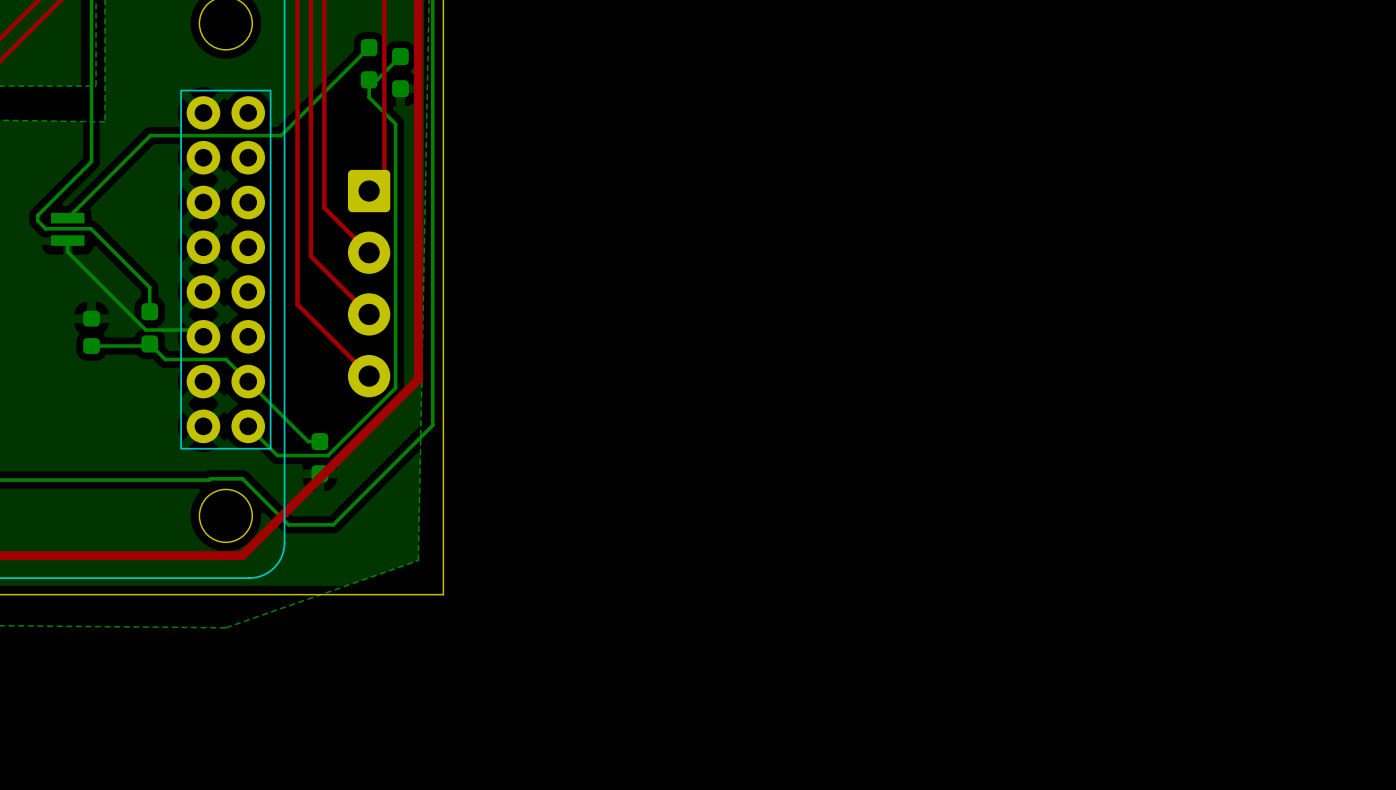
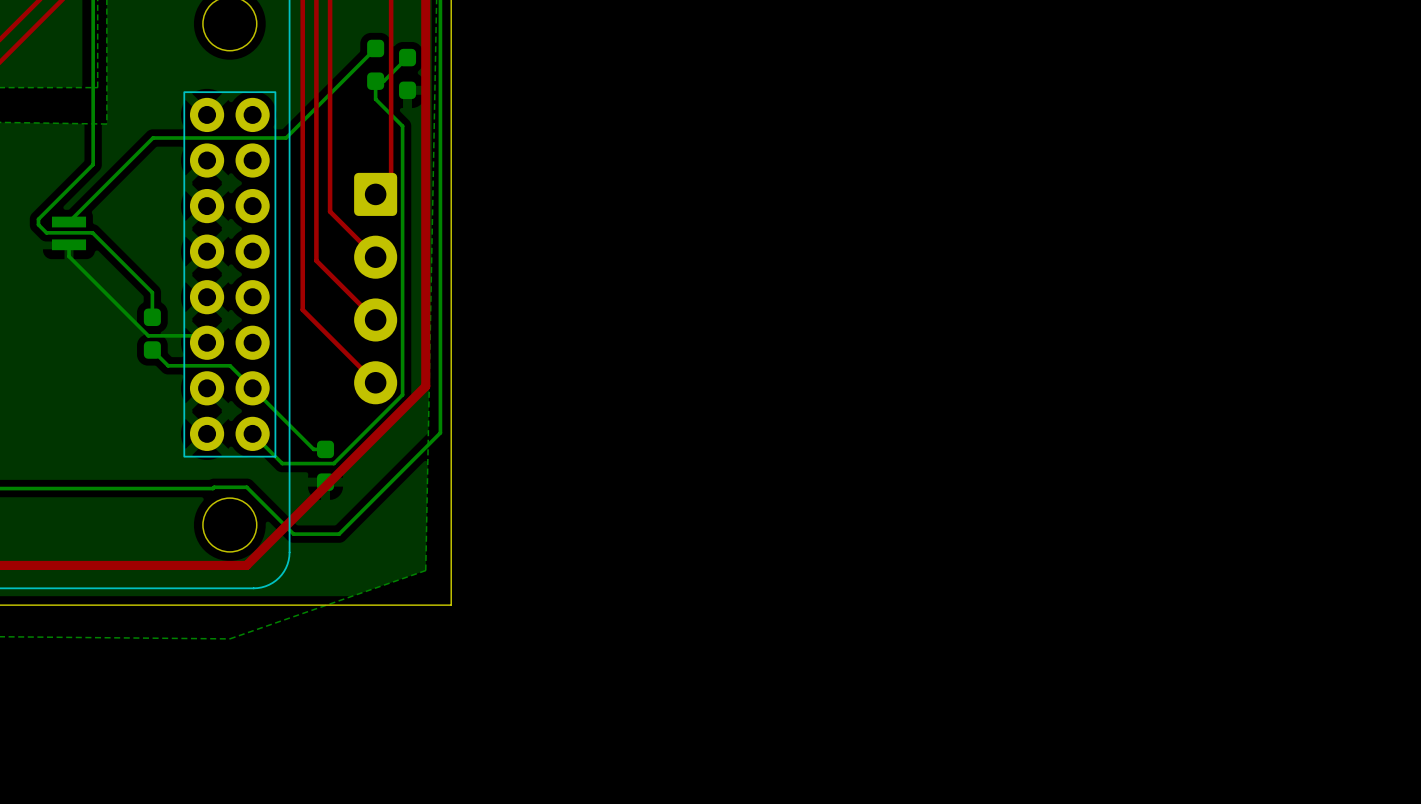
part: (91, 332) -> none
bottom track: (149, 343) (147, 345) (91, 345) -> none

